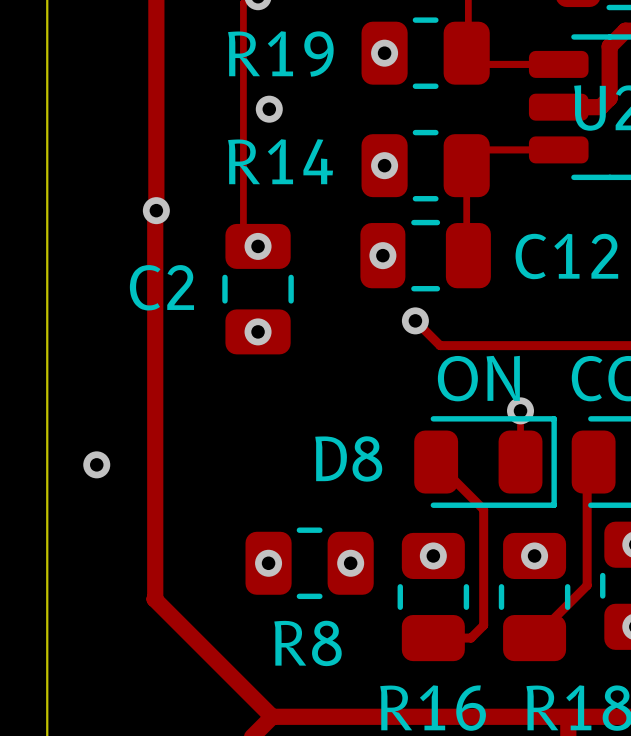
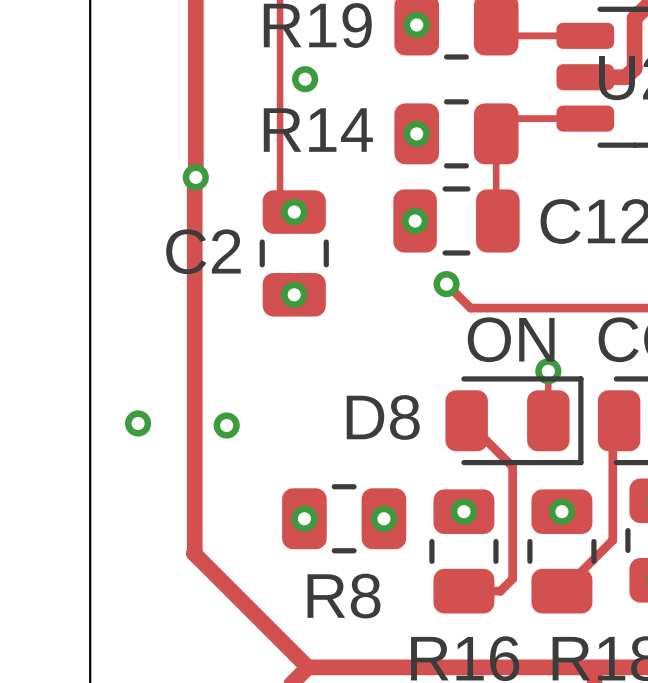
via: none -> (226, 425)

